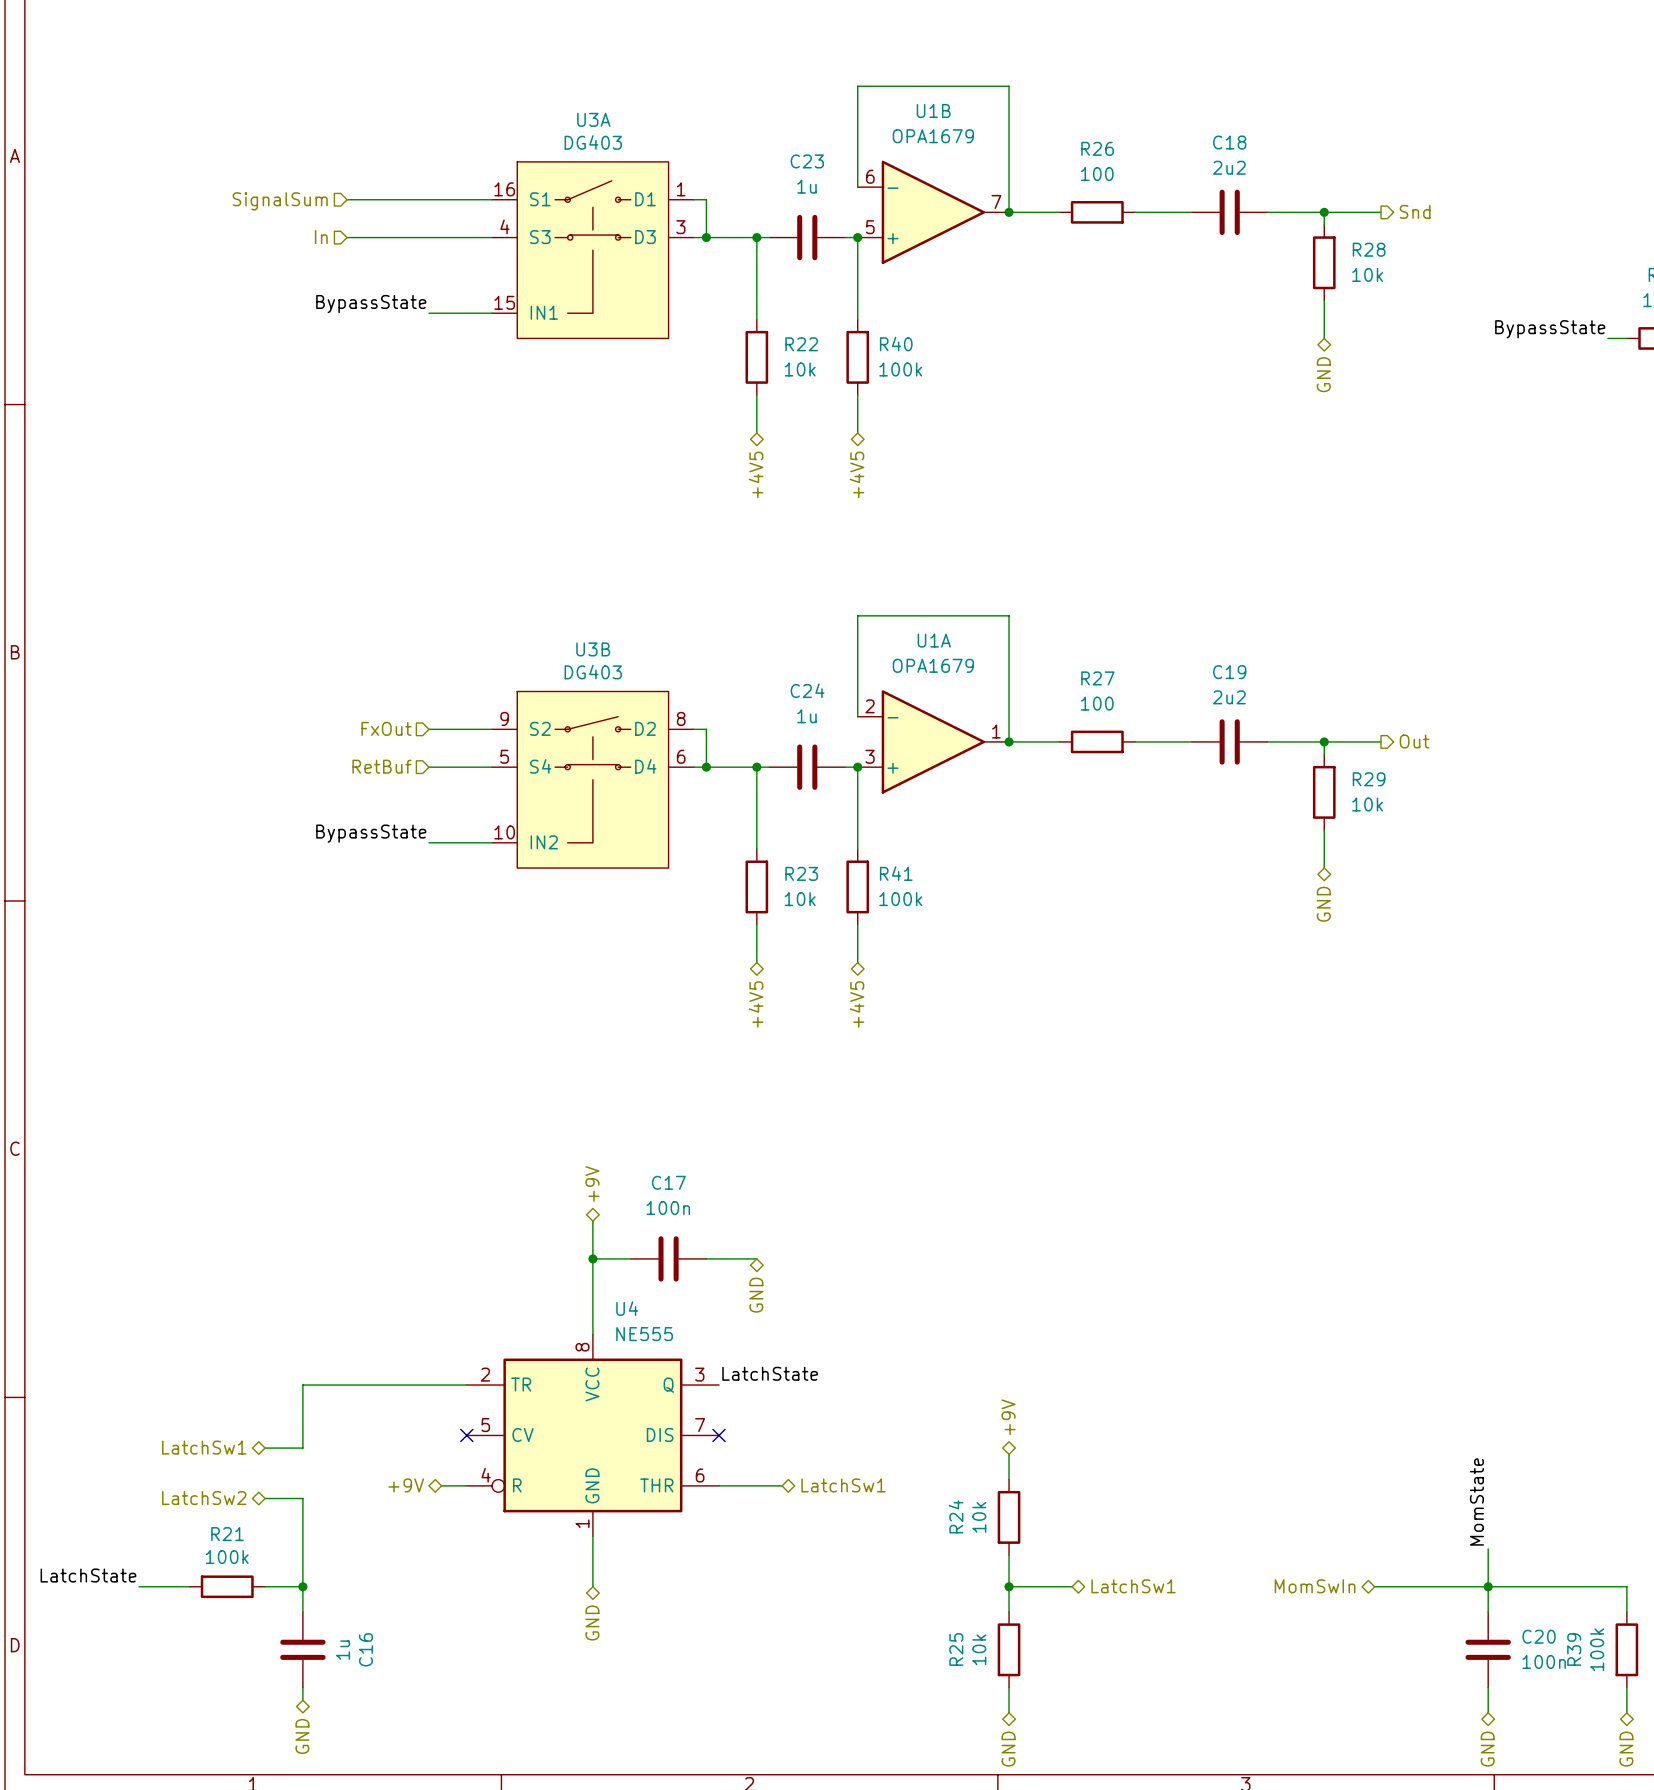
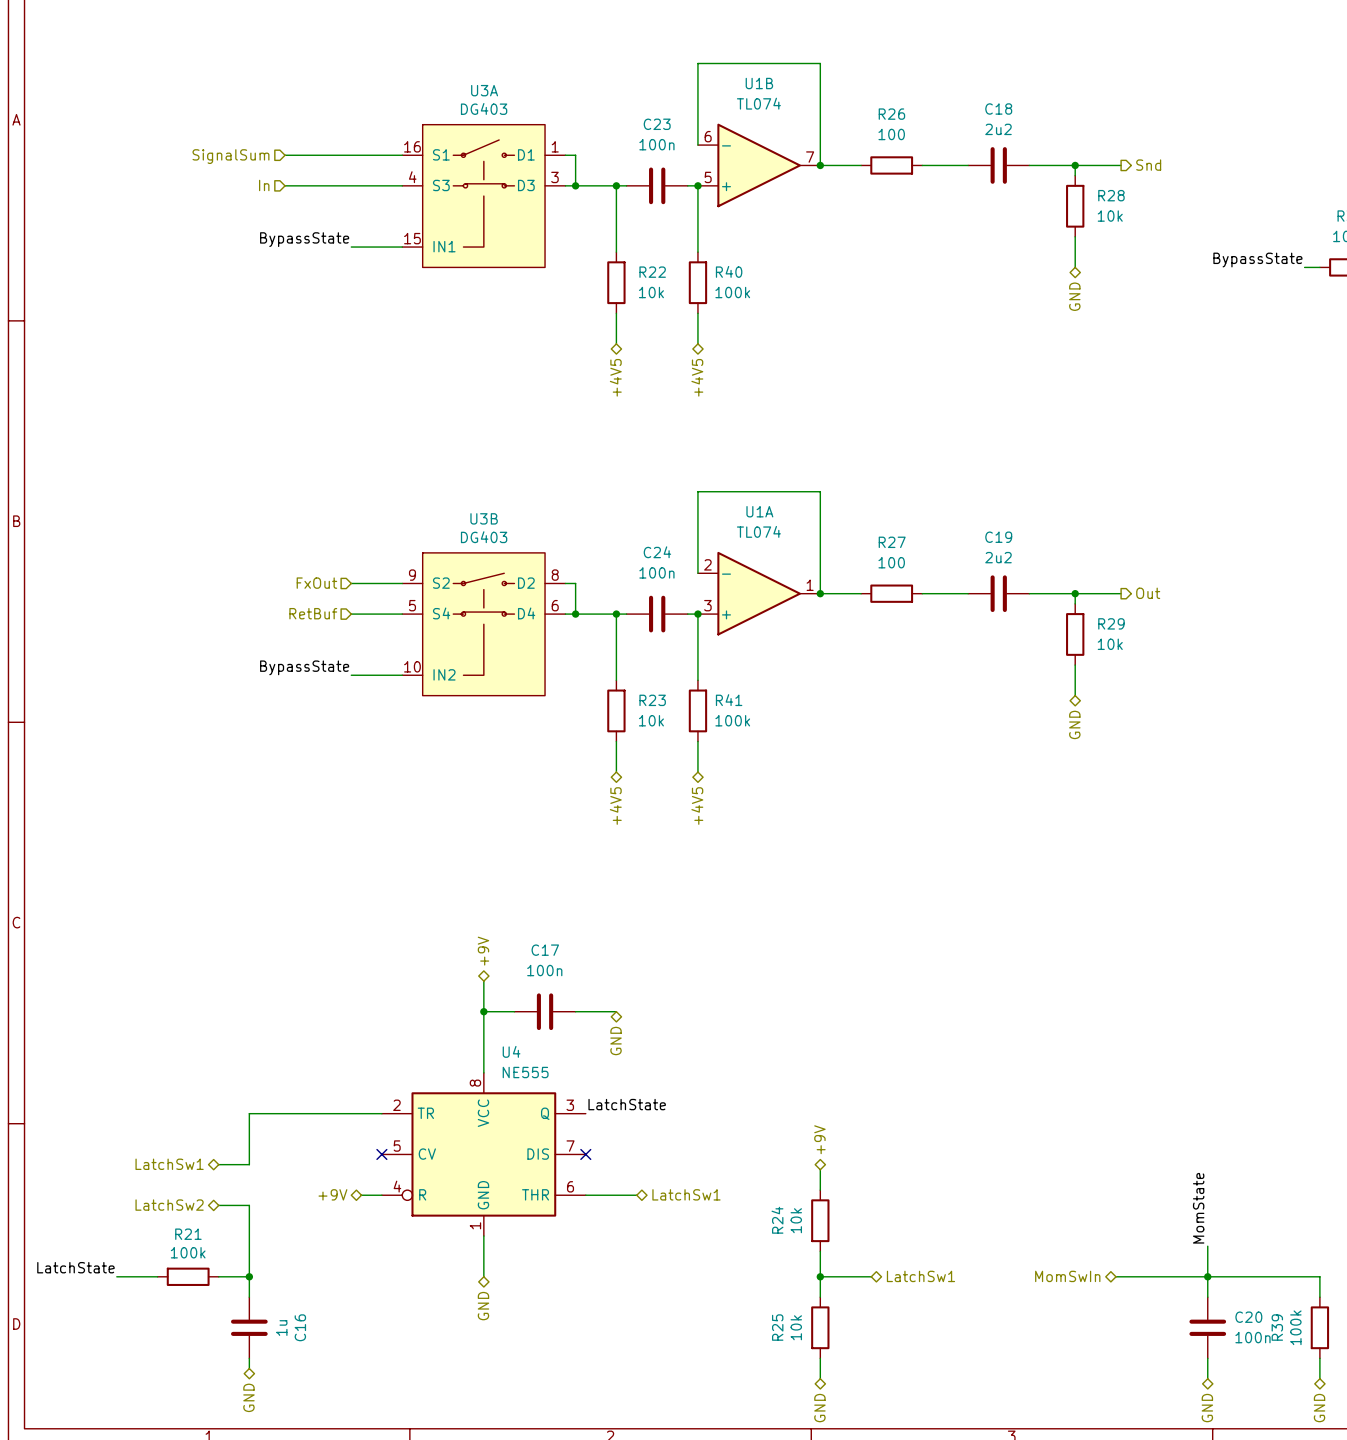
U1B value: OPA1679 (933, 136) -> TL074 (758, 103)
C23 value: 1u (806, 186) -> 100n (656, 144)
U1A value: OPA1679 (933, 665) -> TL074 (758, 531)
C24 value: 1u (806, 716) -> 100n (656, 572)

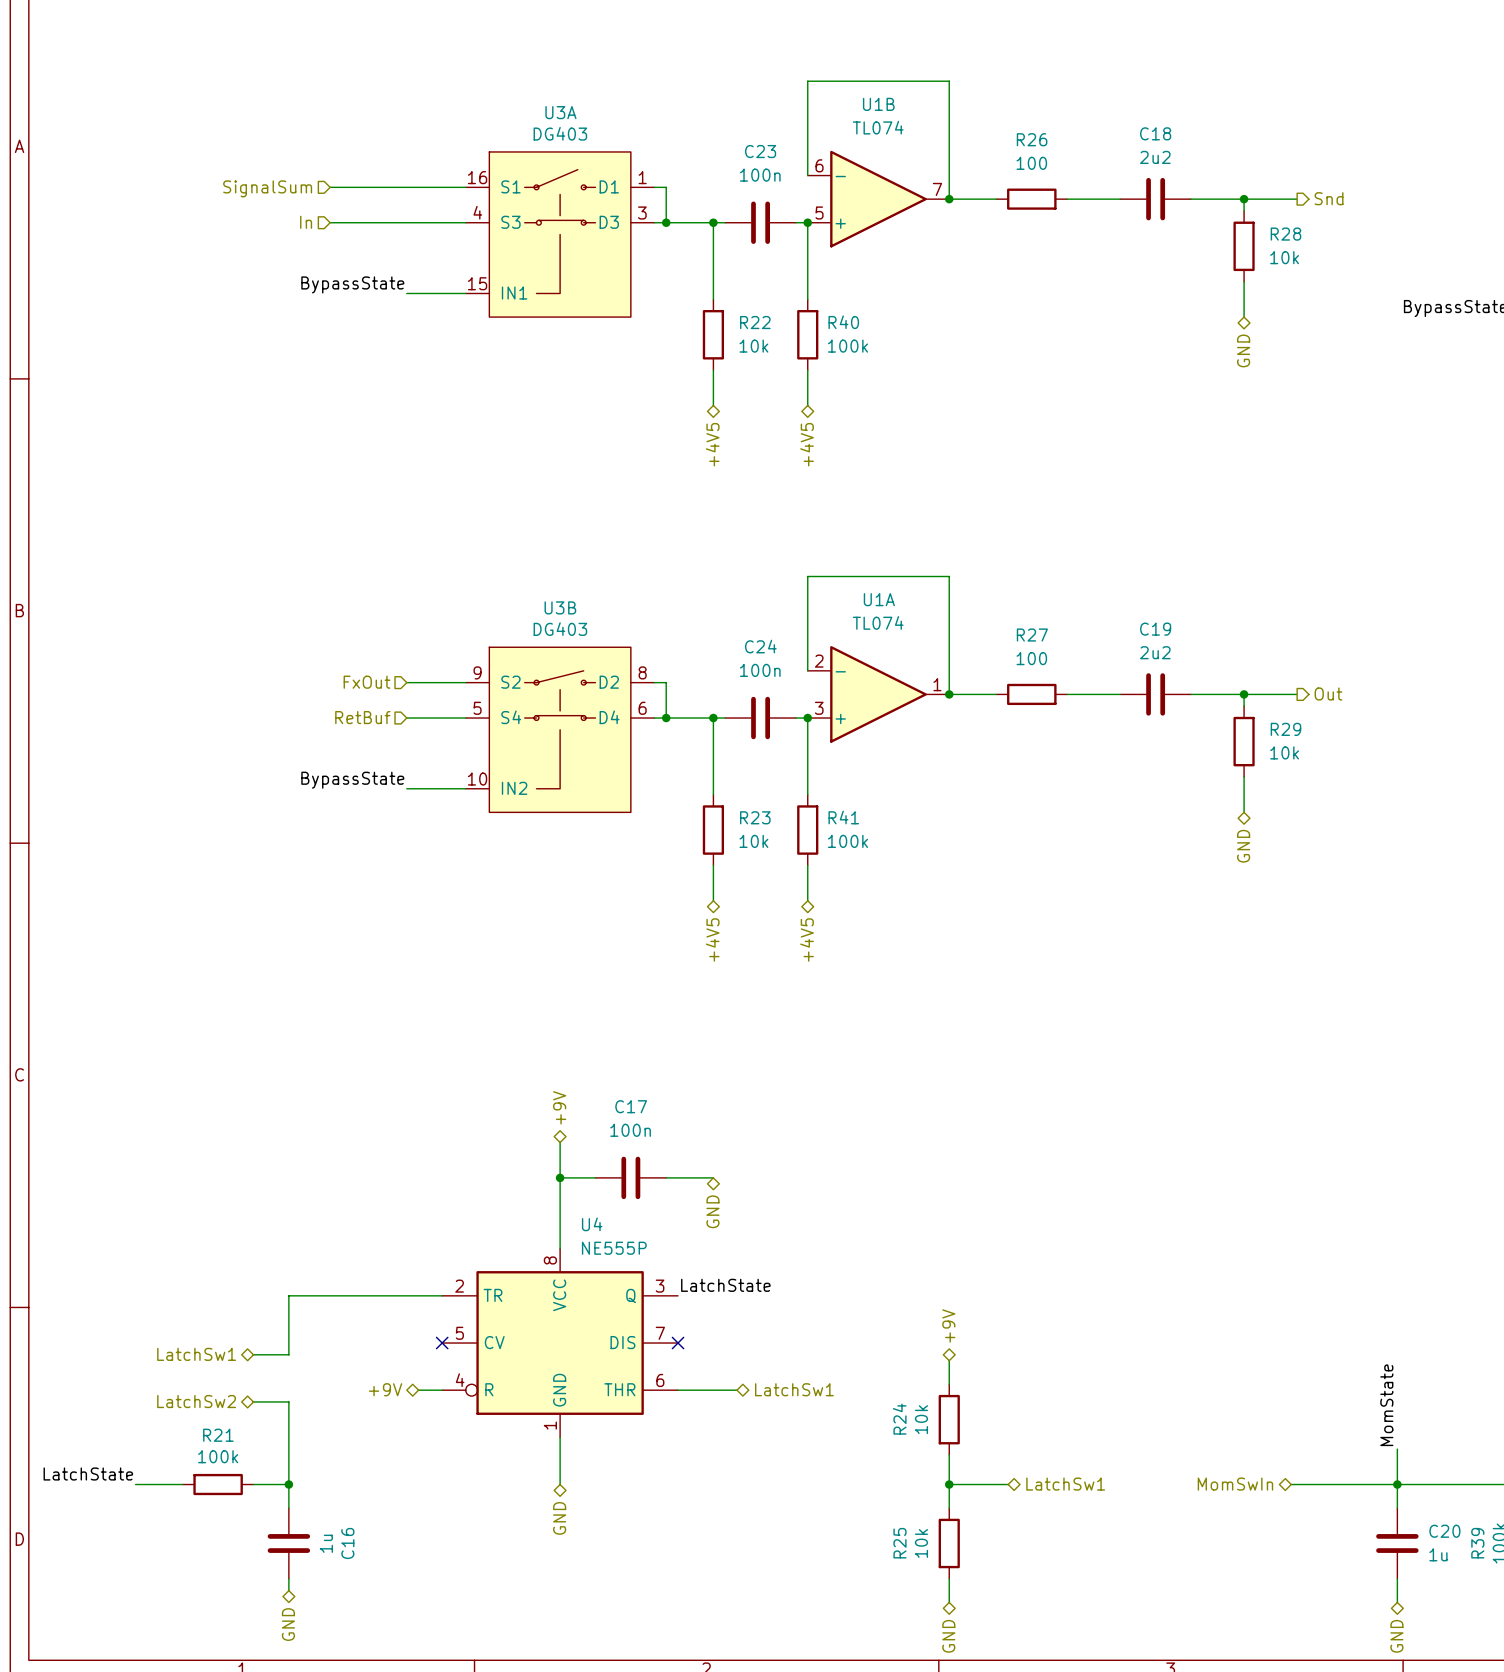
U4 value: NE555 (525, 1072) -> NE555P (614, 1248)
C20 value: 100n (1252, 1337) -> 1u (1438, 1554)

